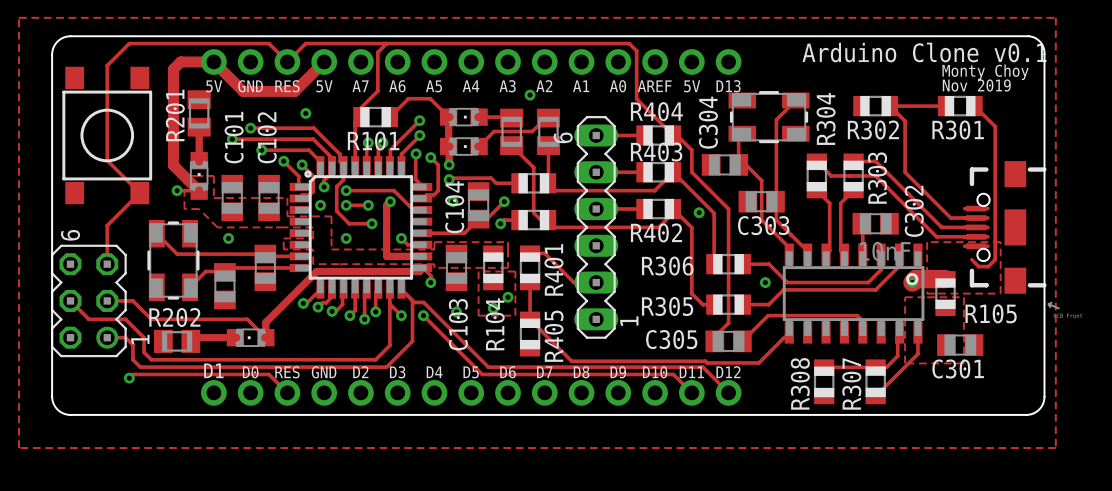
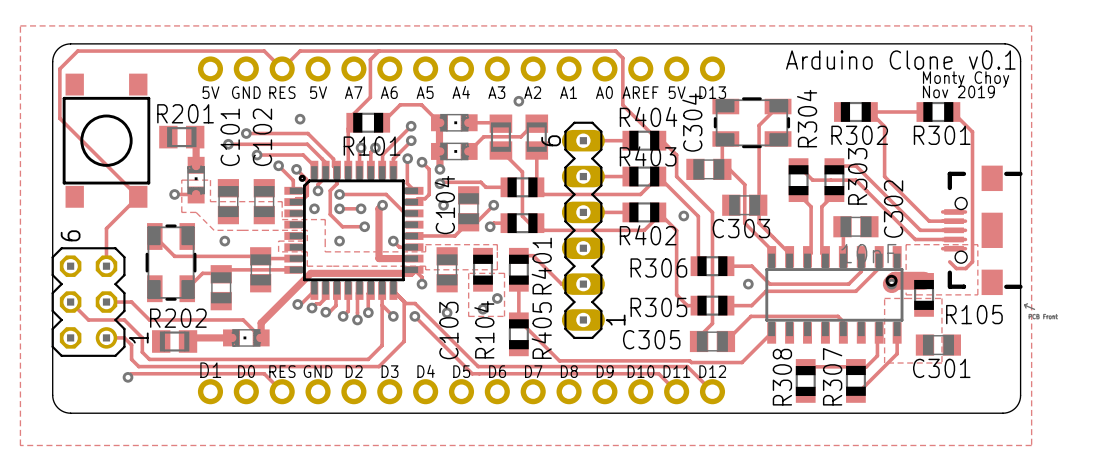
track: (129, 43) (107, 65) (107, 160) -> (128, 51) (77, 51) (59, 68) (59, 118) (106, 165)
track: (324, 61) (294, 91) (243, 91) (213, 61) (180, 61) (173, 69) (173, 165) (198, 190) -> none
R201 rotation: 0° (199, 113) -> 90° clockwise (181, 137)

